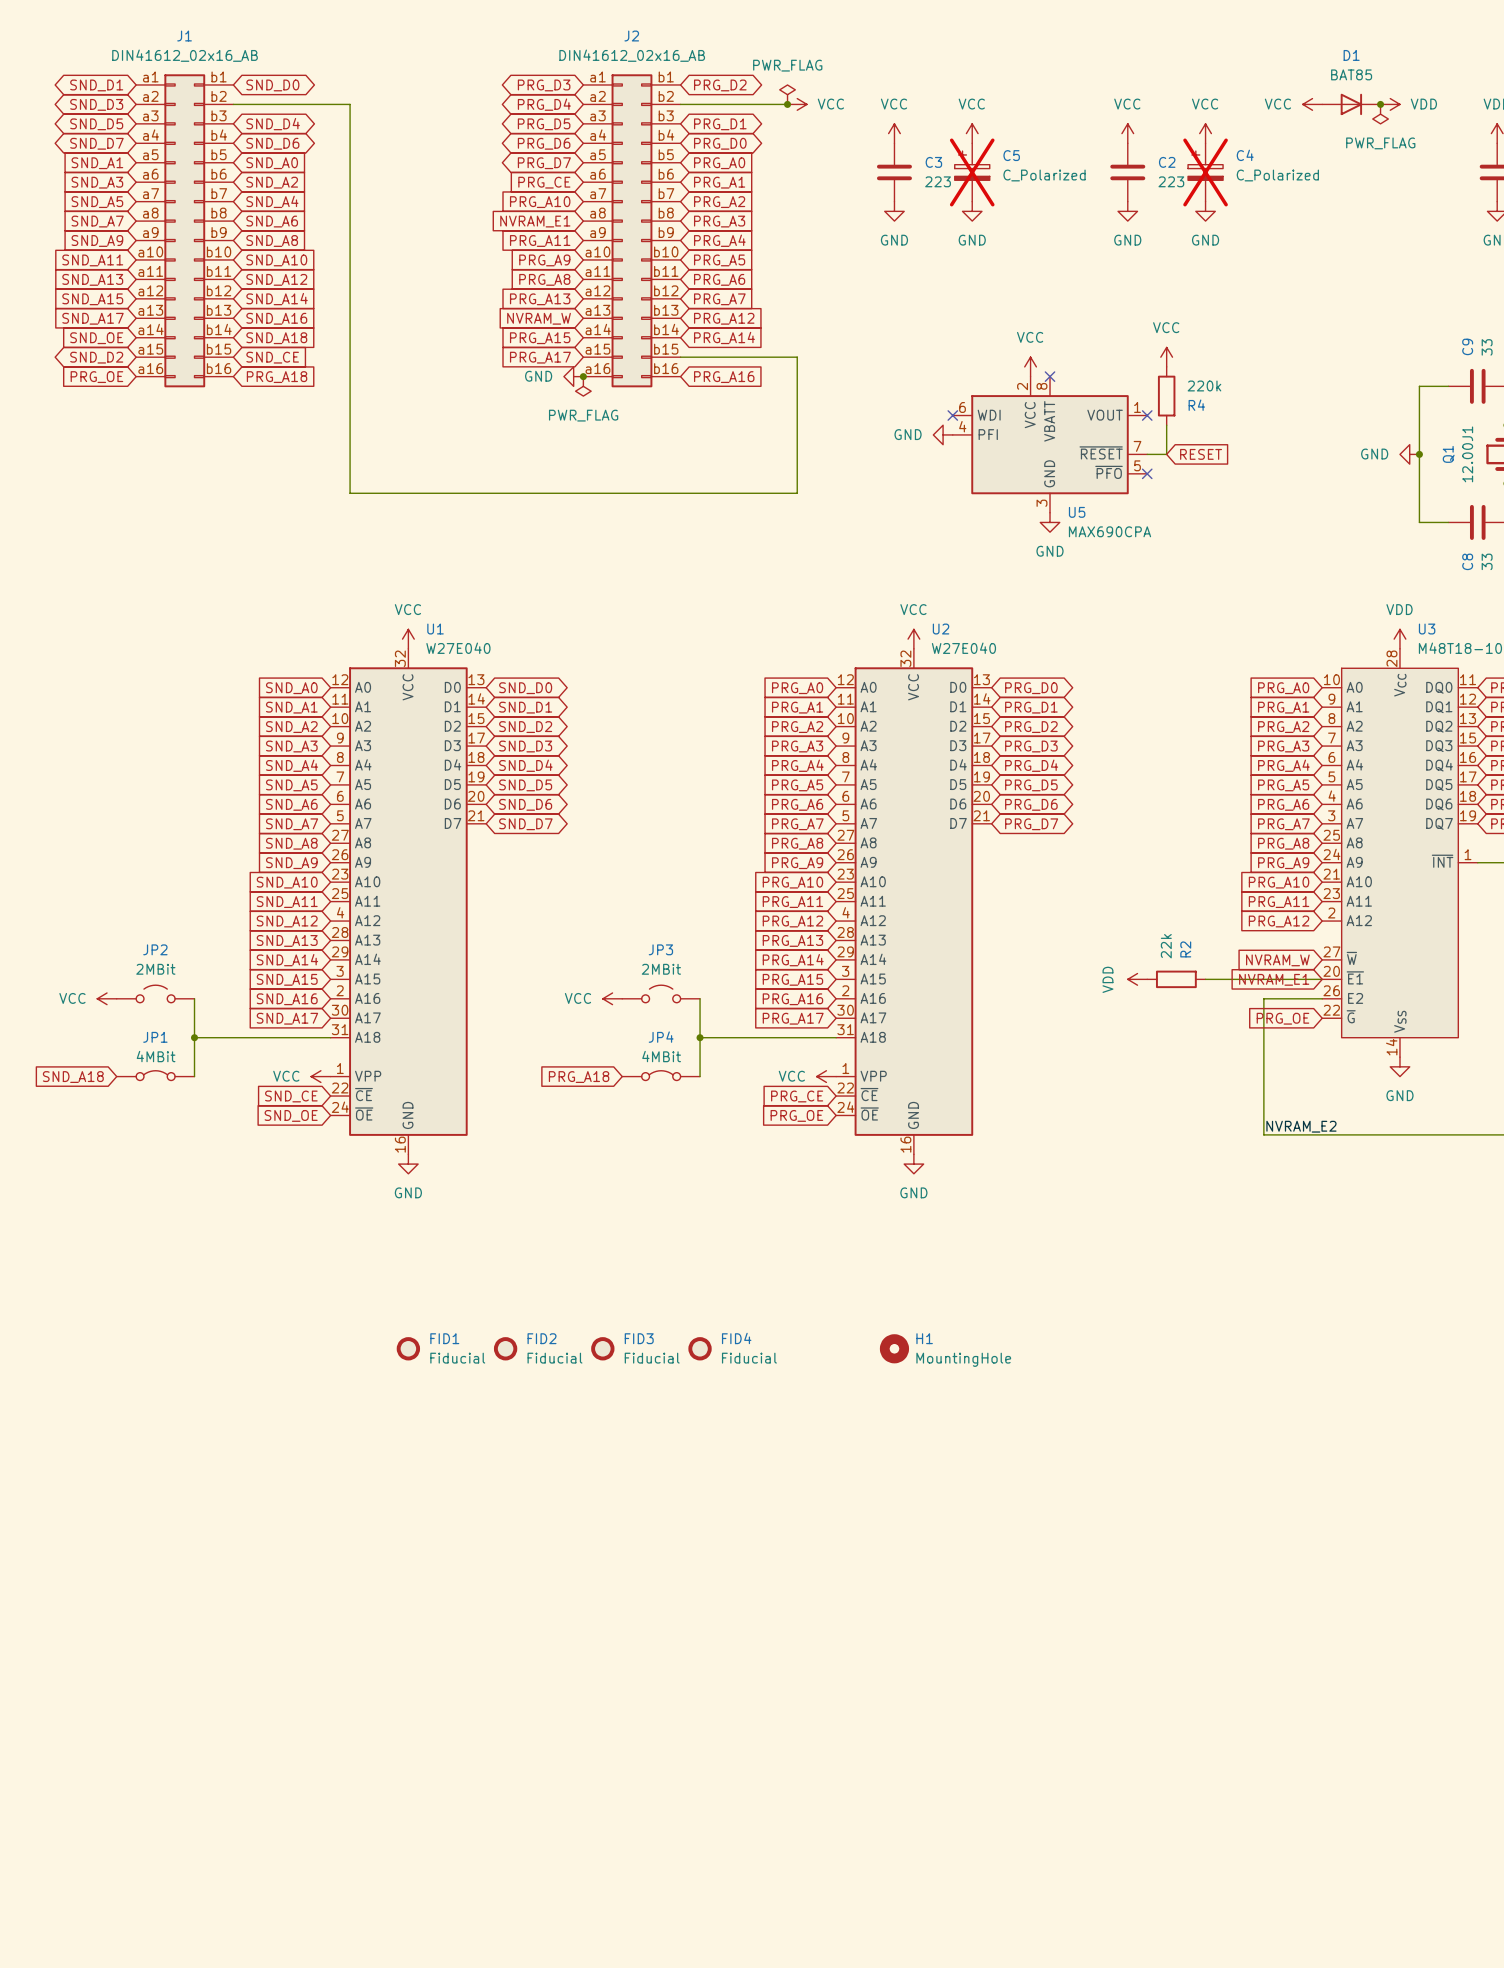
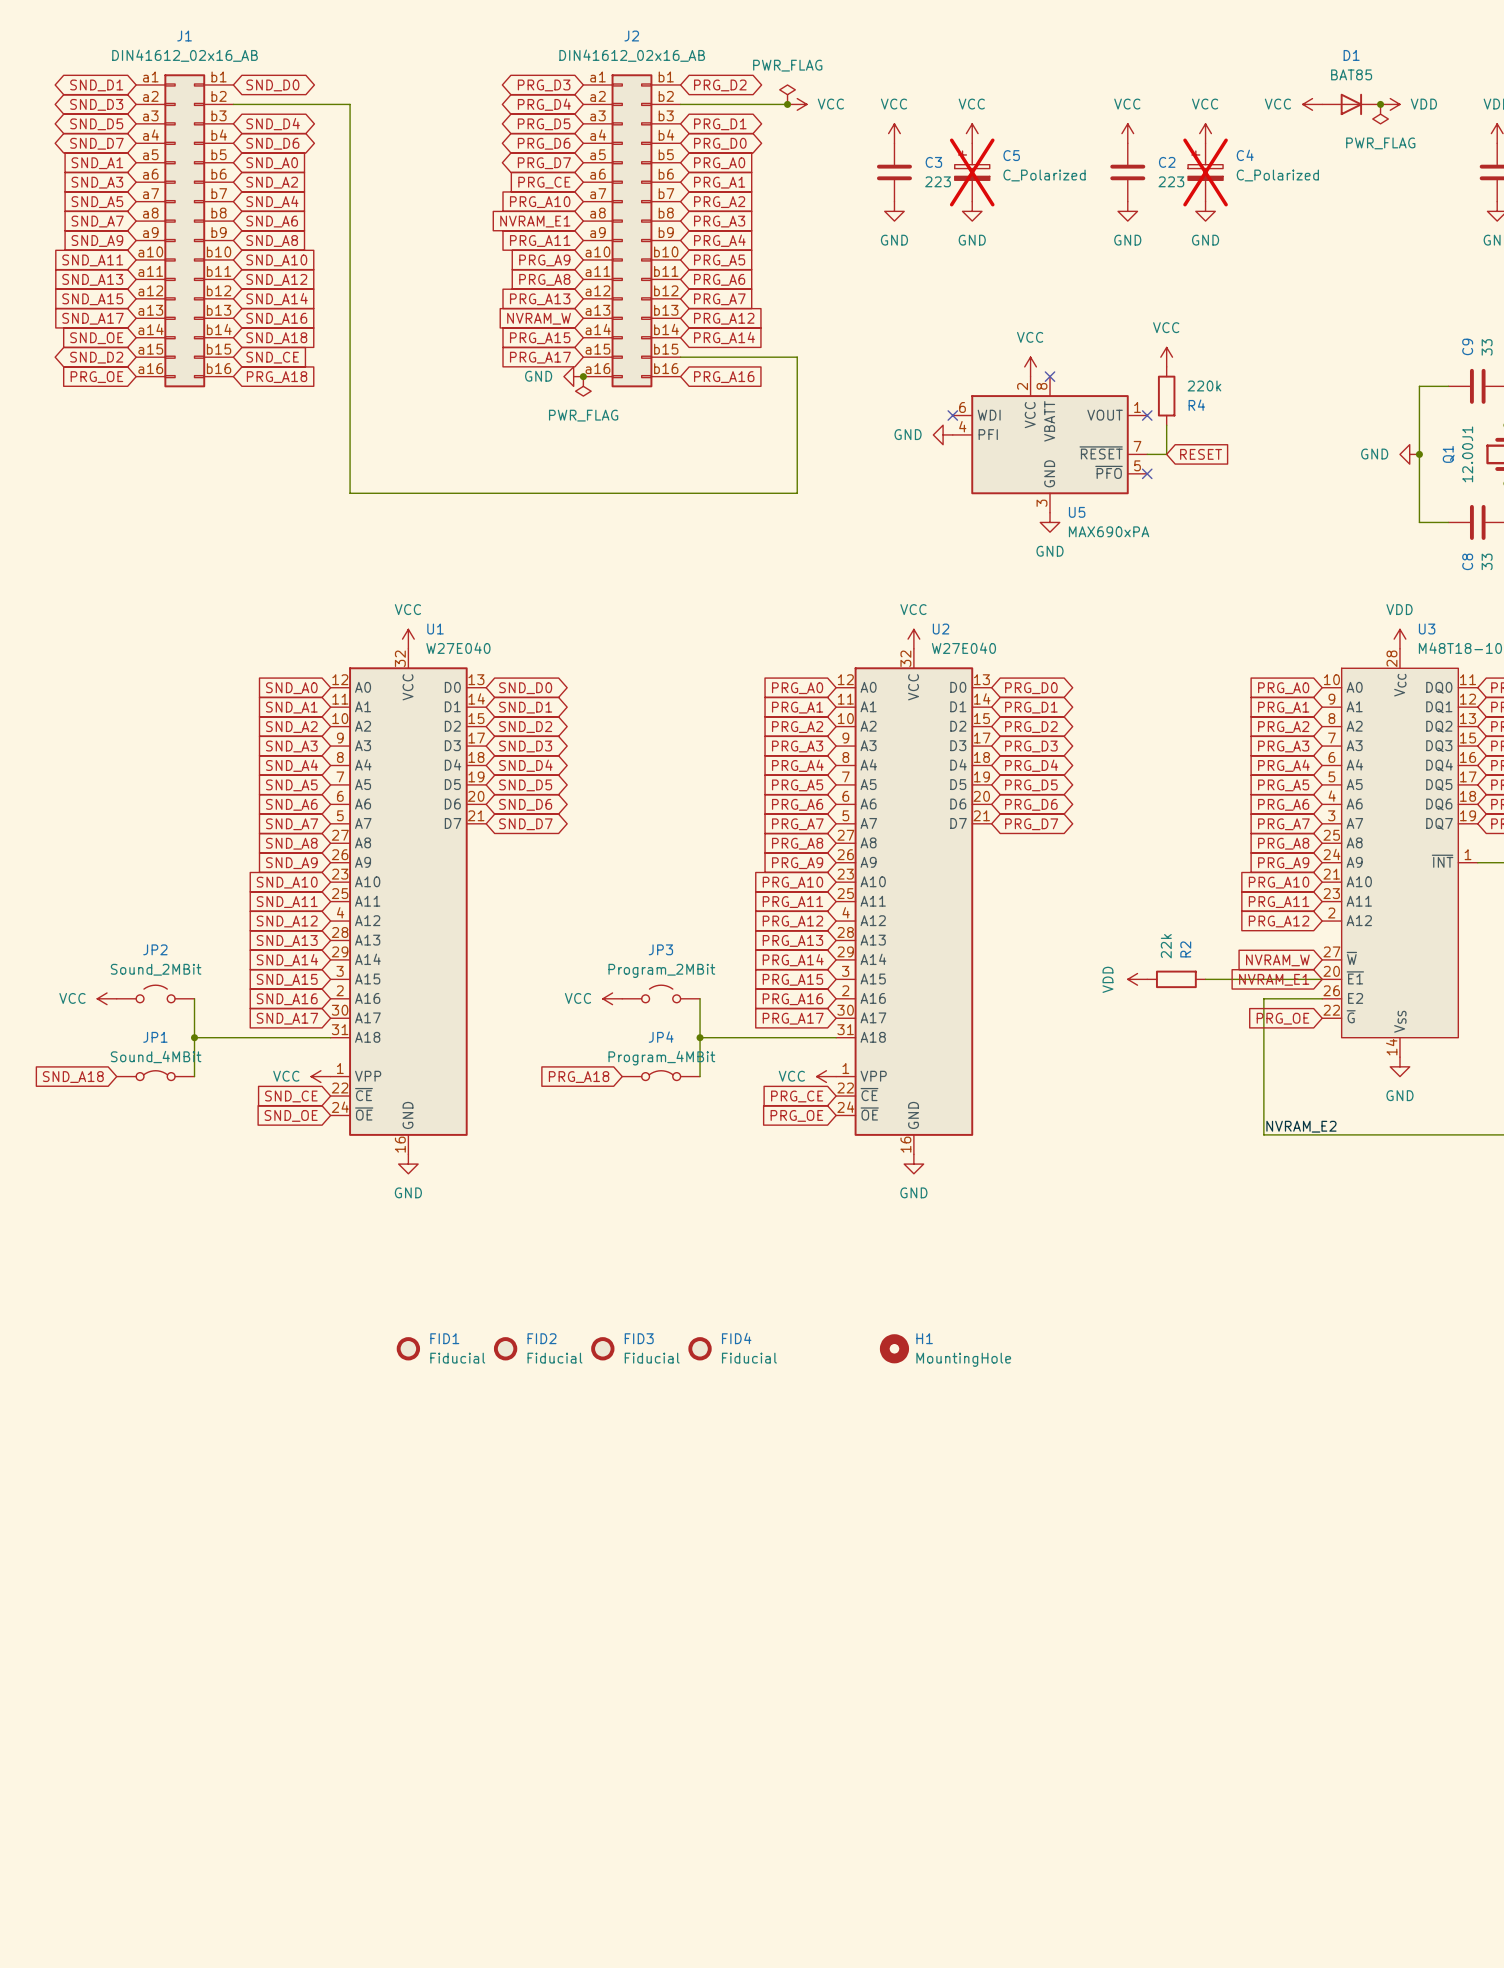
U5 value: MAX690CPA (1110, 531) -> MAX690xPA (1109, 531)
JP2 value: 2MBit (155, 969) -> Sound_2MBit (156, 969)
JP3 value: 2MBit (661, 969) -> Program_2MBit (661, 970)
JP1 value: 4MBit (156, 1056) -> Sound_4MBit (156, 1057)
JP4 value: 4MBit (661, 1056) -> Program_4MBit (661, 1058)

